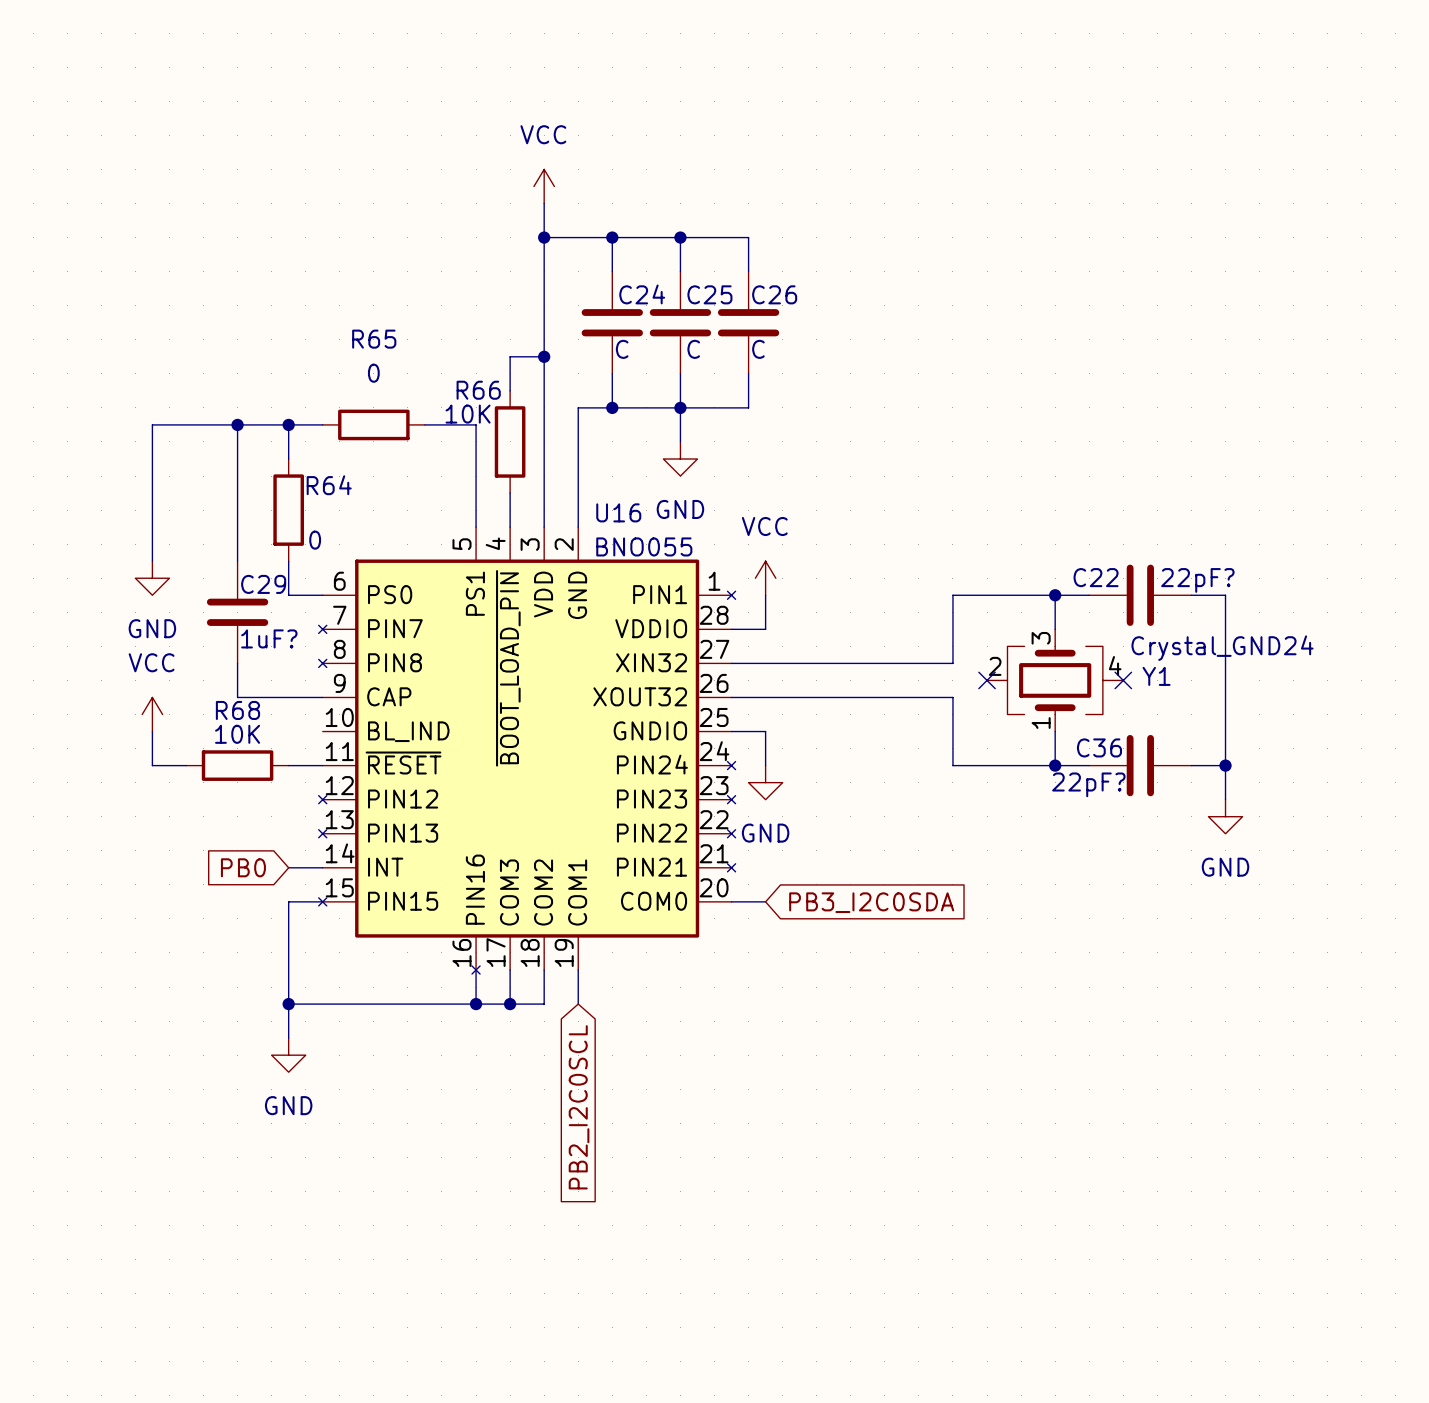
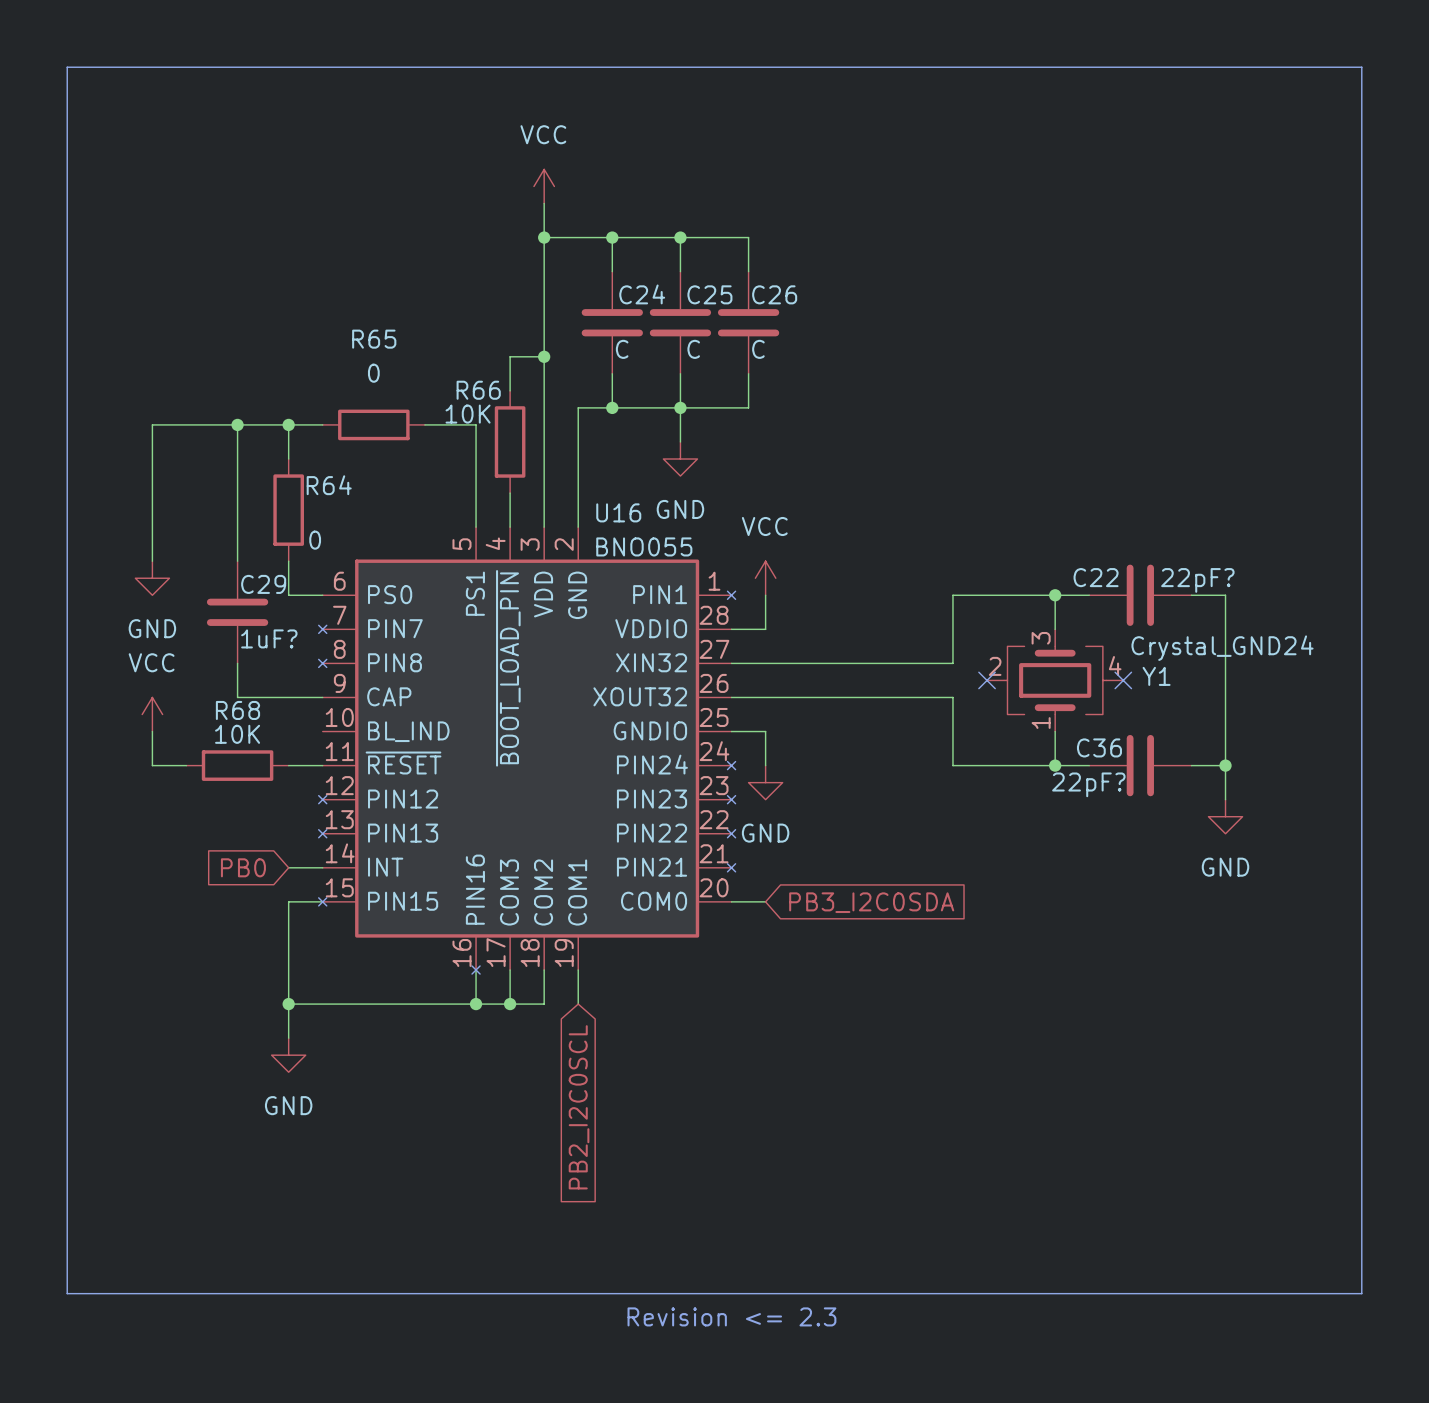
line: none -> (67, 67) (1361, 67) (1361, 1293) (67, 1293) (67, 67)
text: none -> Revision <= 2.3 (731, 1316)

